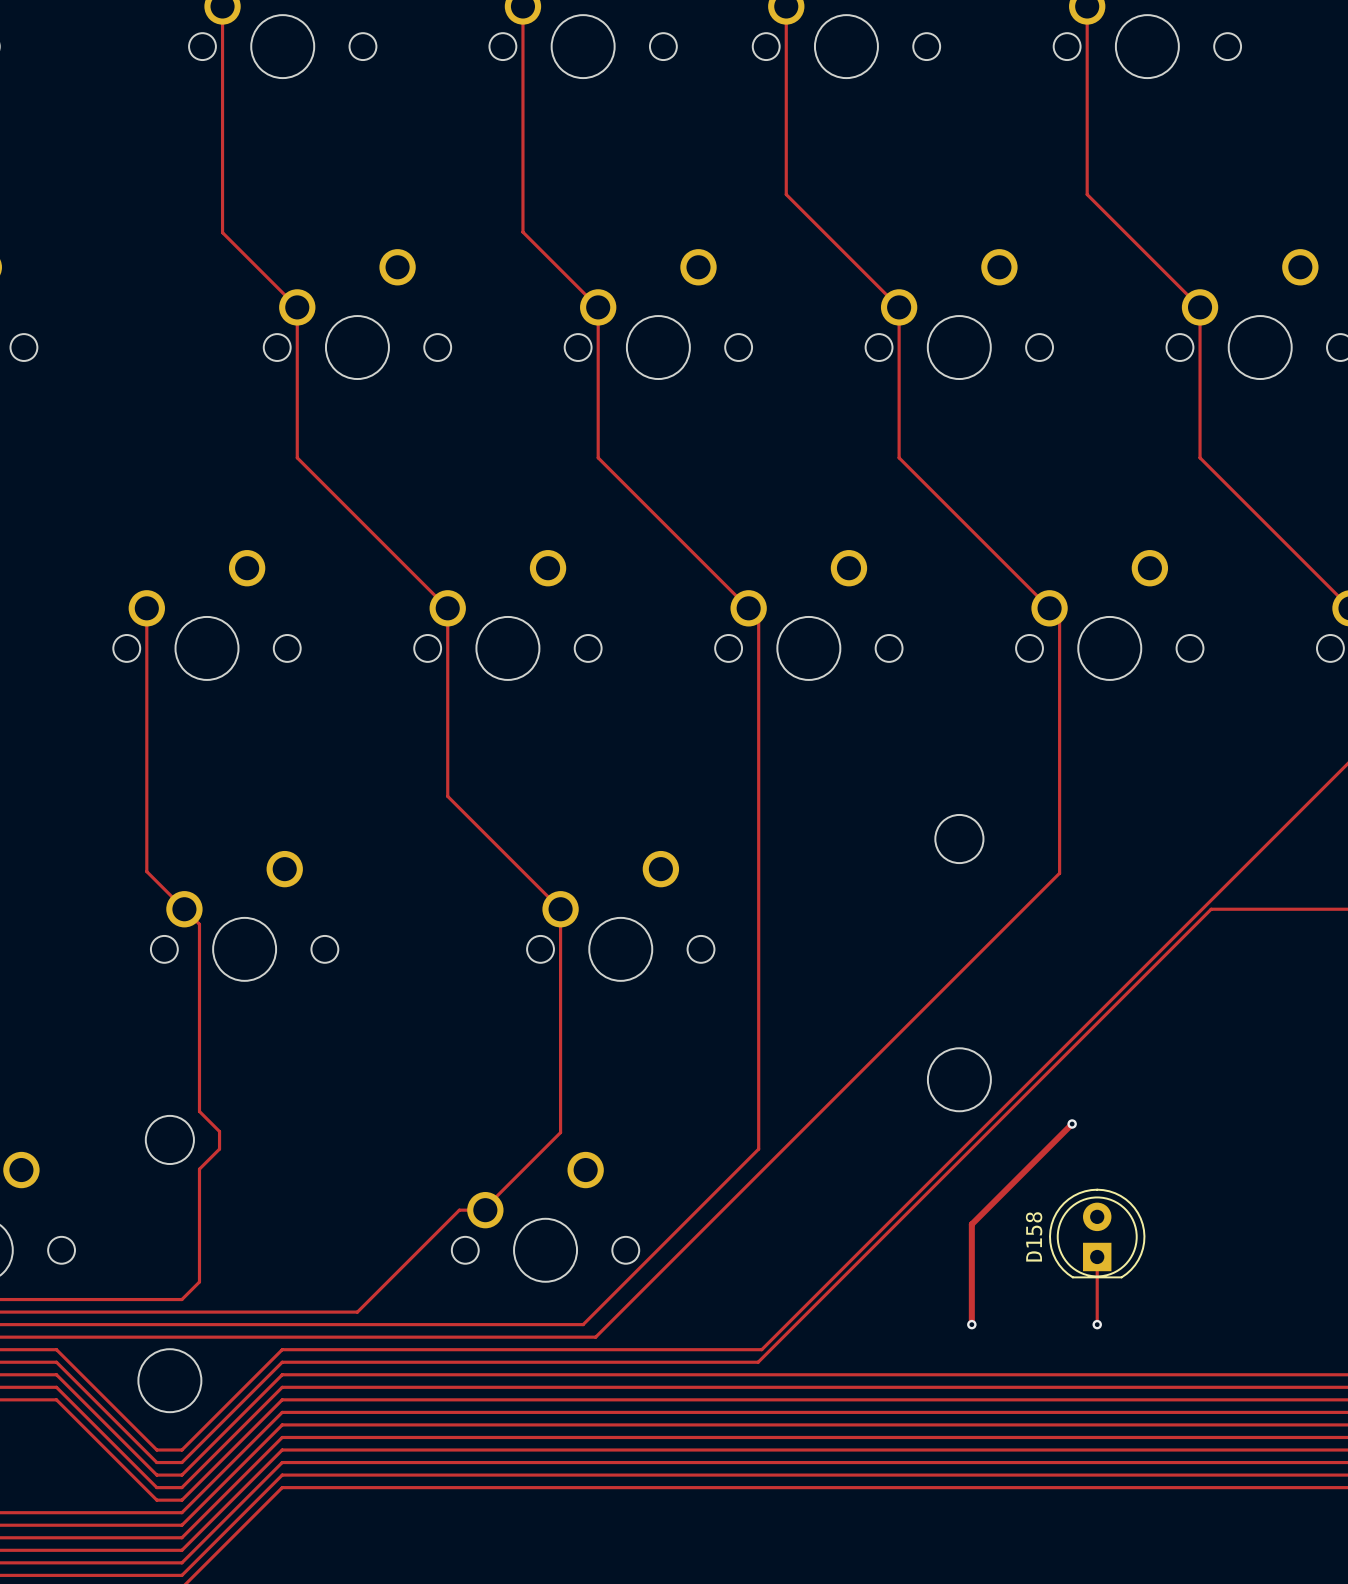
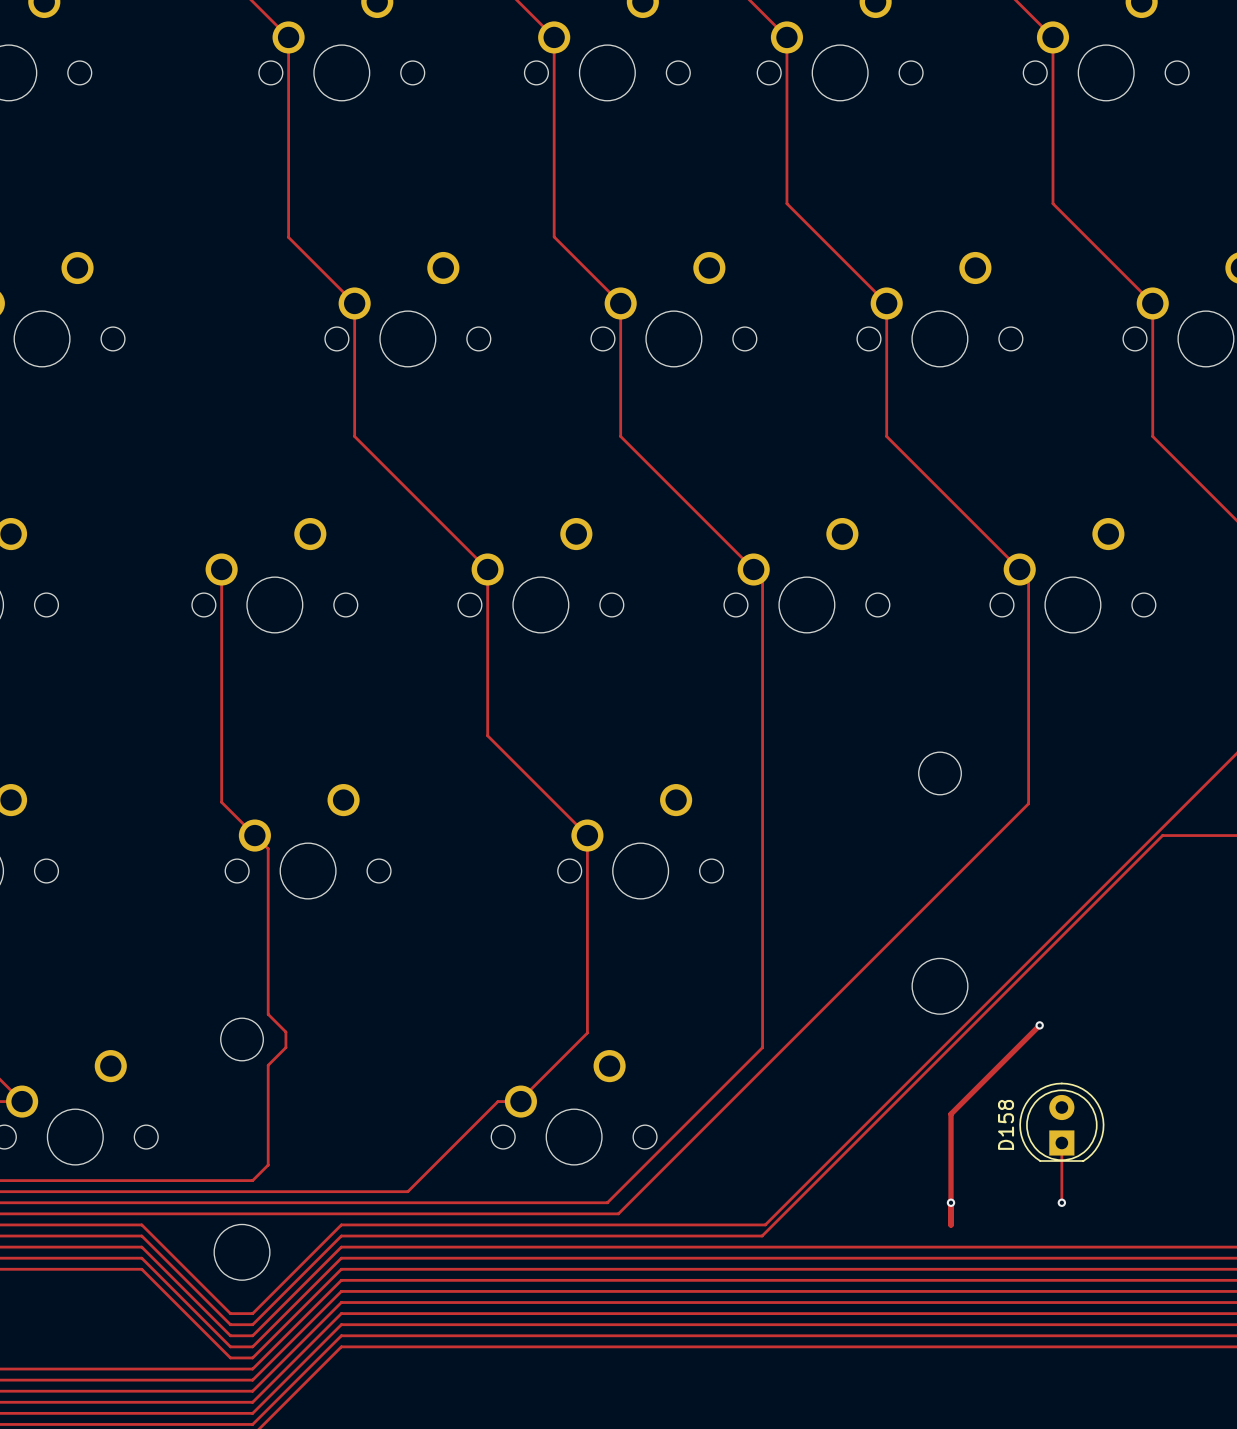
track: none -> (951, 1202) (951, 1224)

